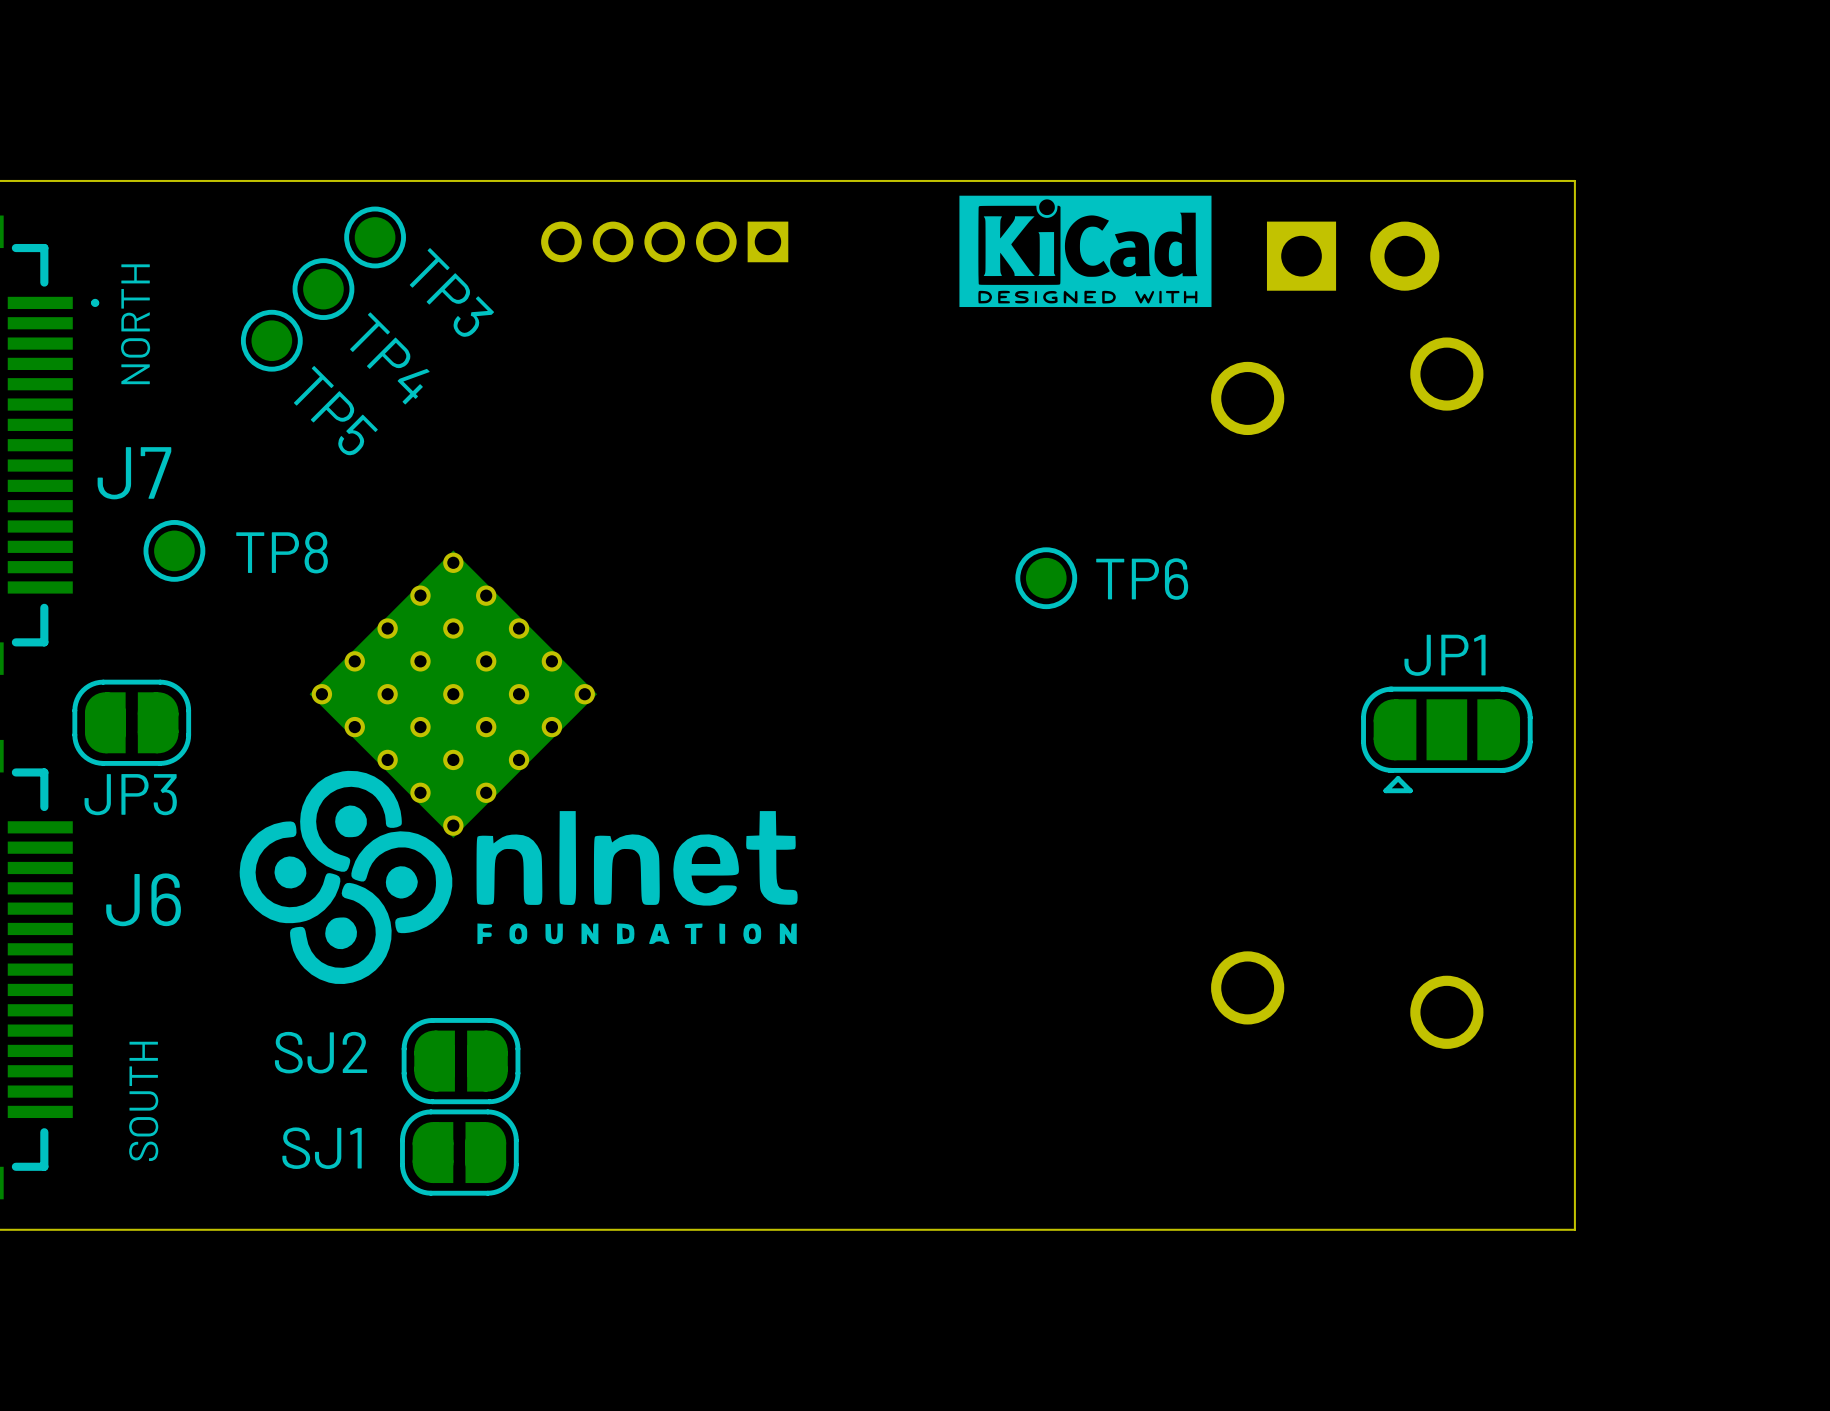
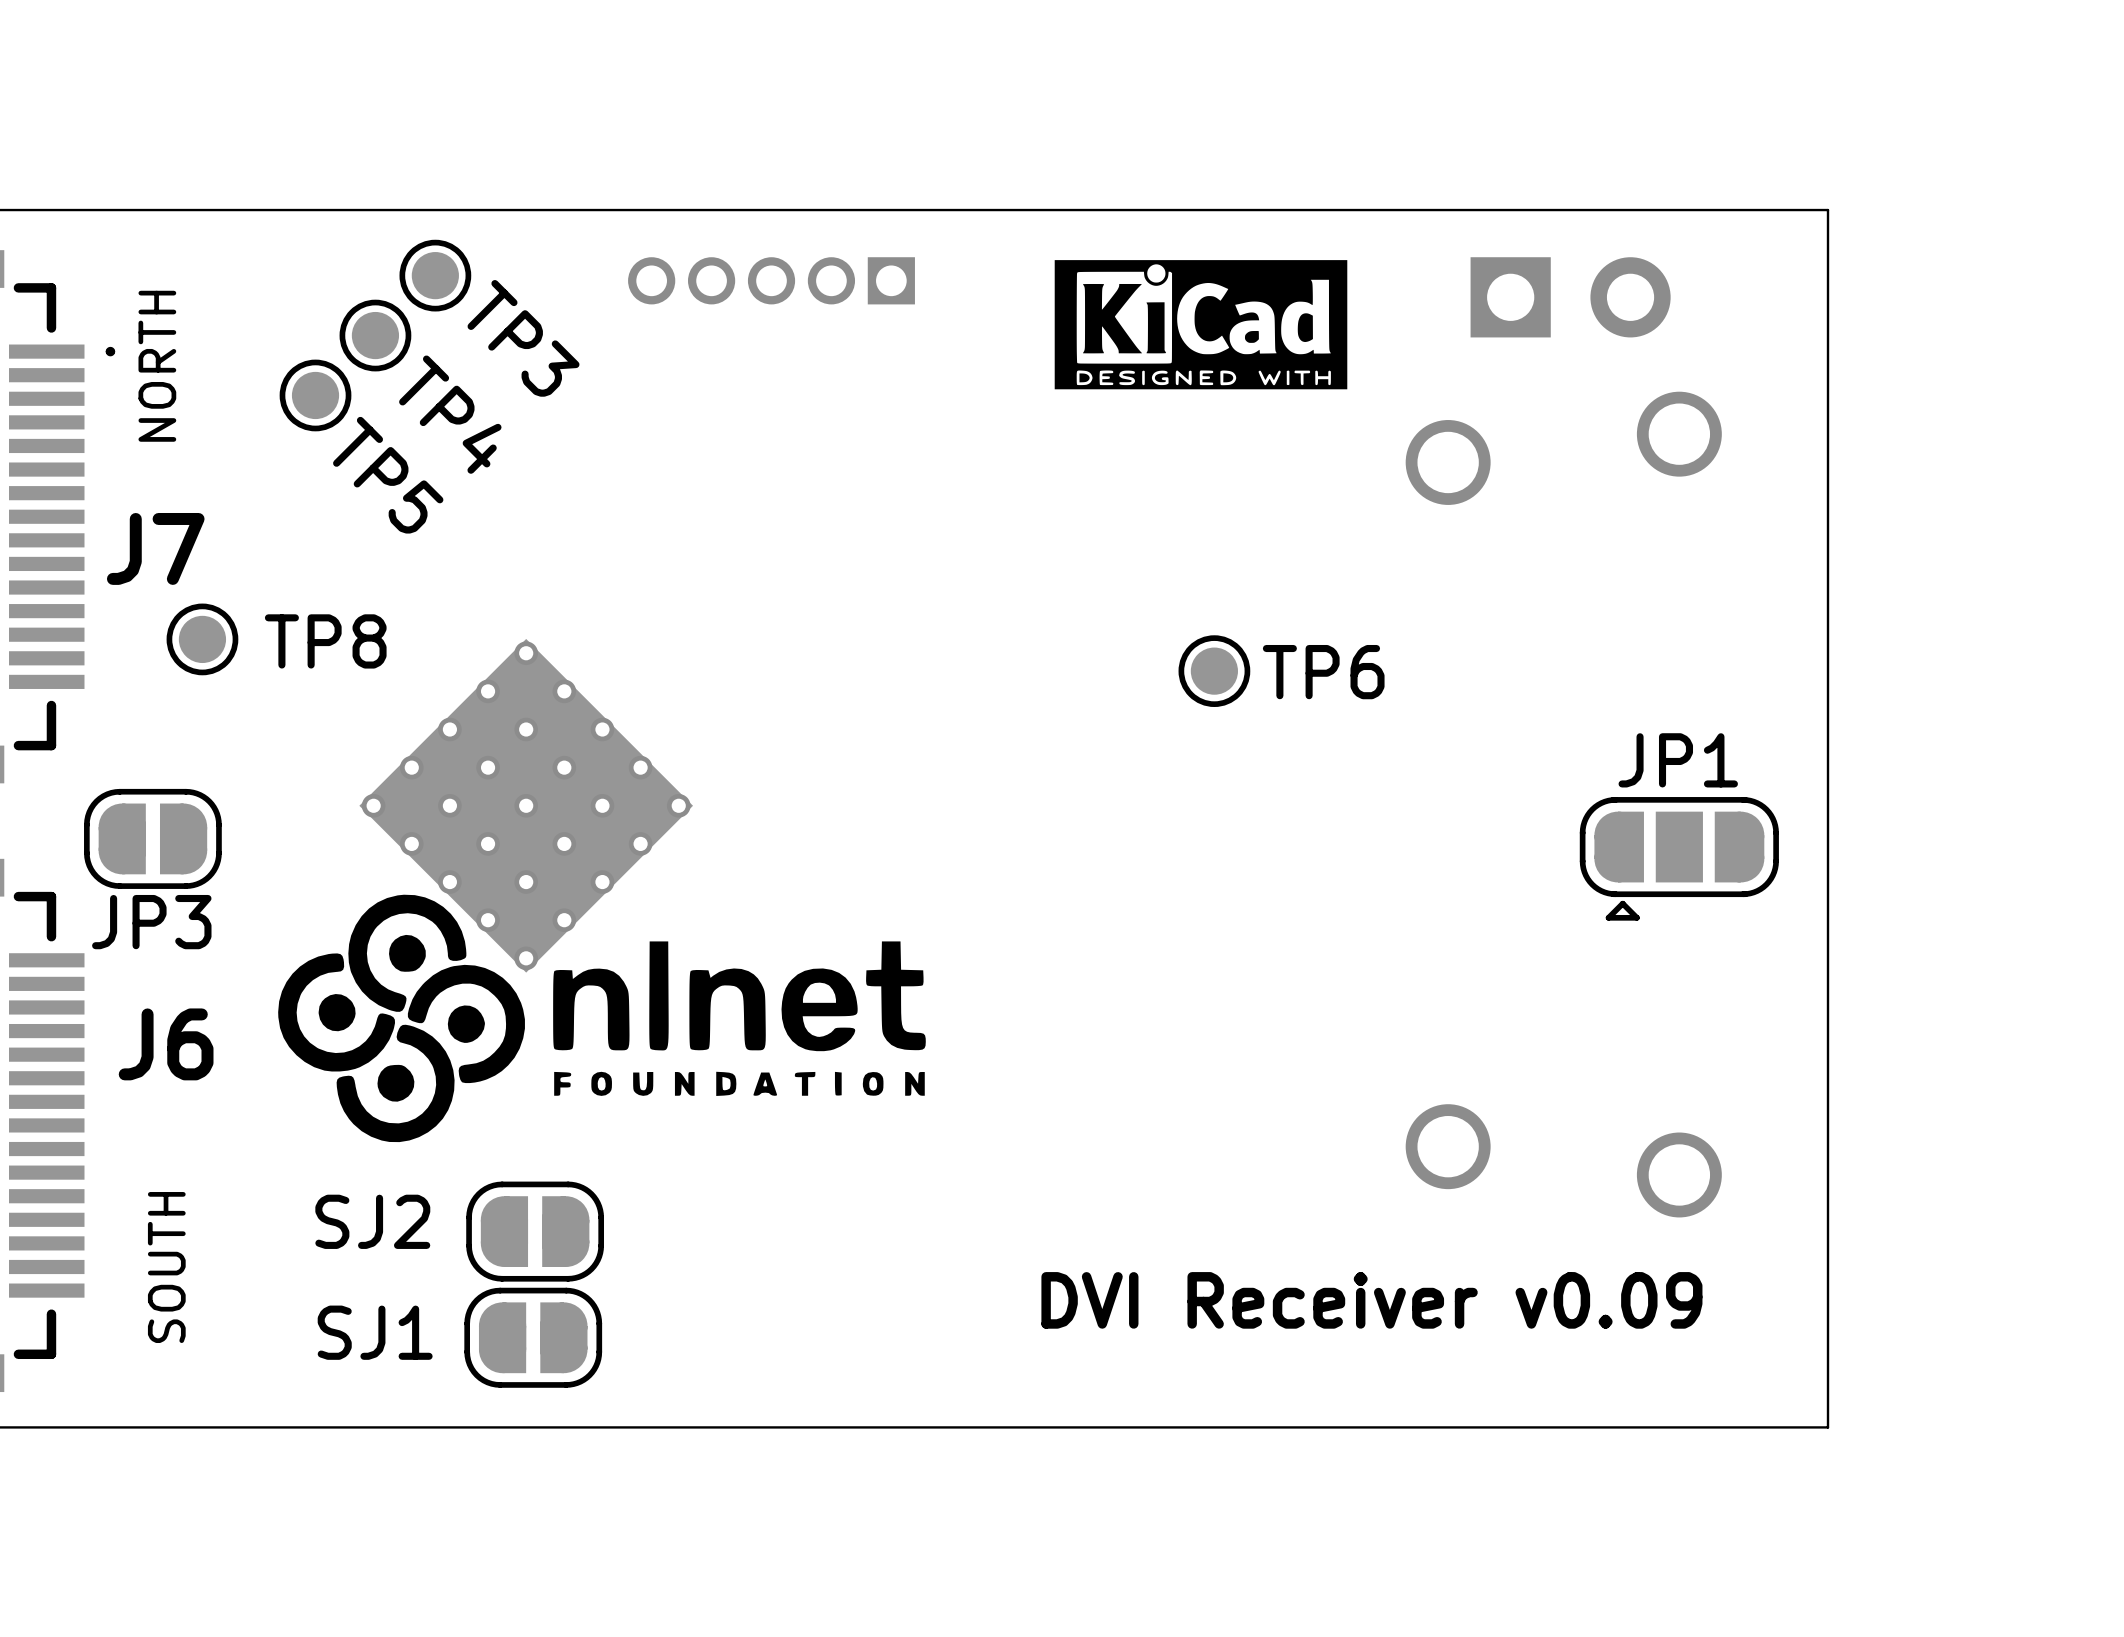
drawing position: (1085, 251) -> (1201, 324)
text: none -> DVI Receiver v0.09 (1371, 1300)

